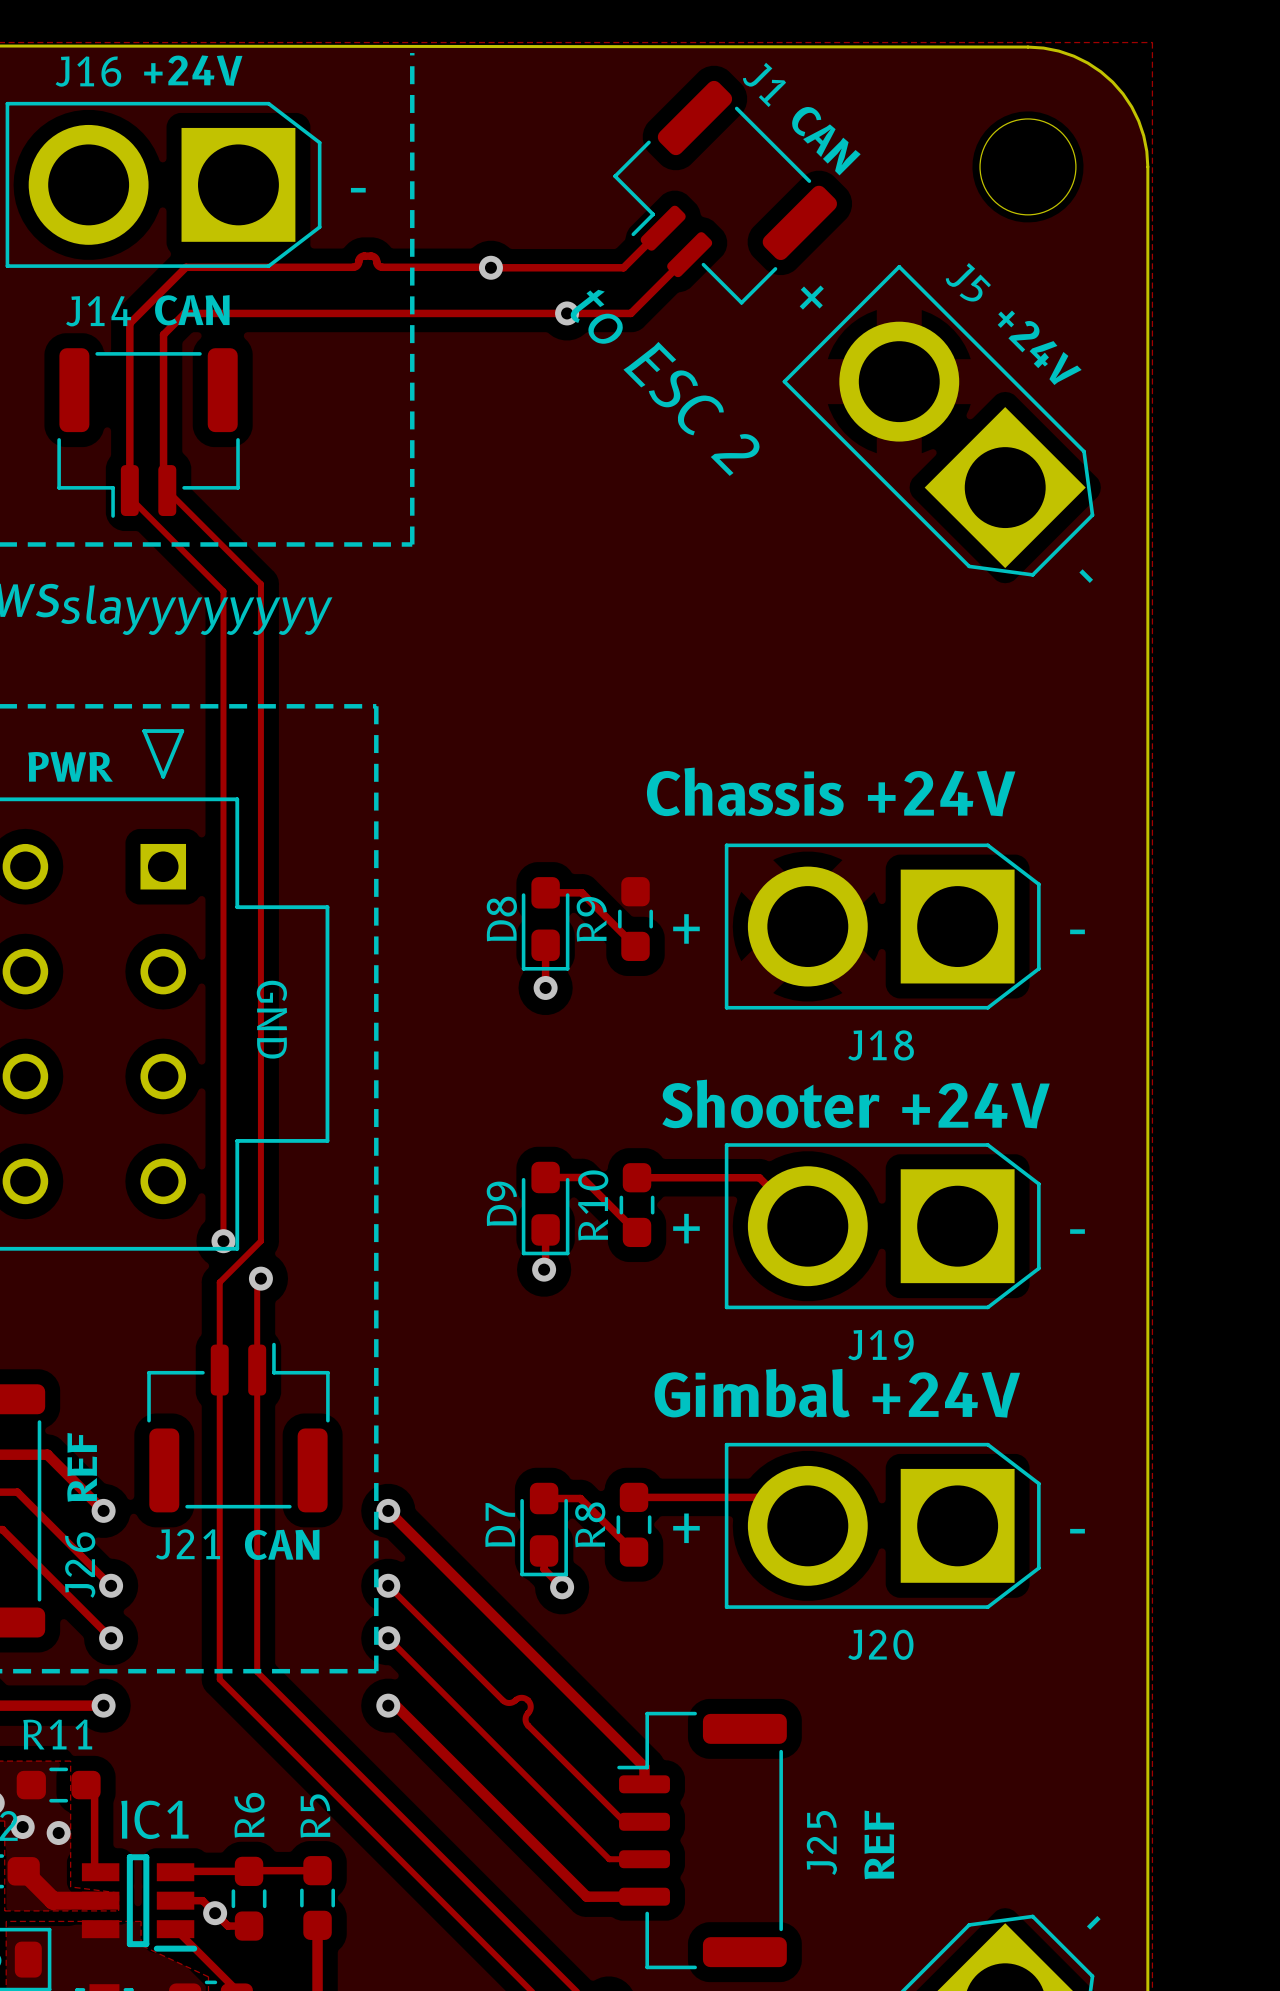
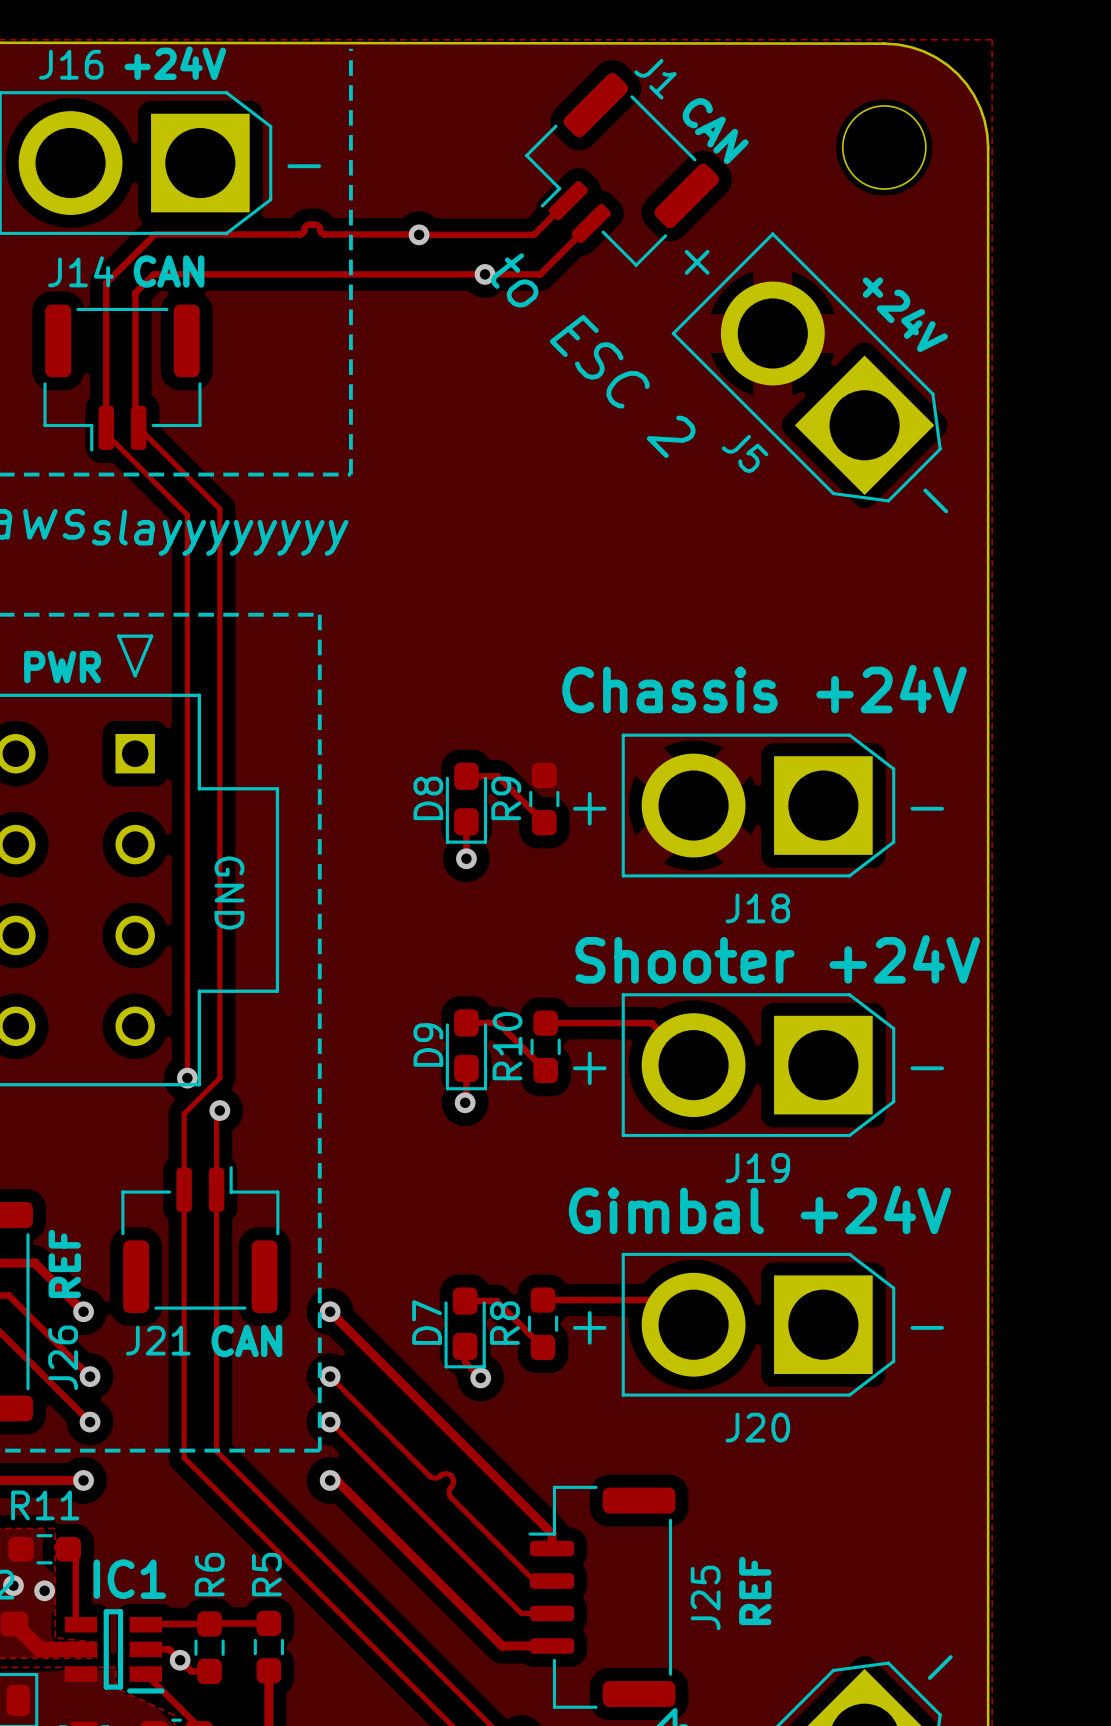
J5 name position: J5 (968, 282) -> J5 (745, 453)

